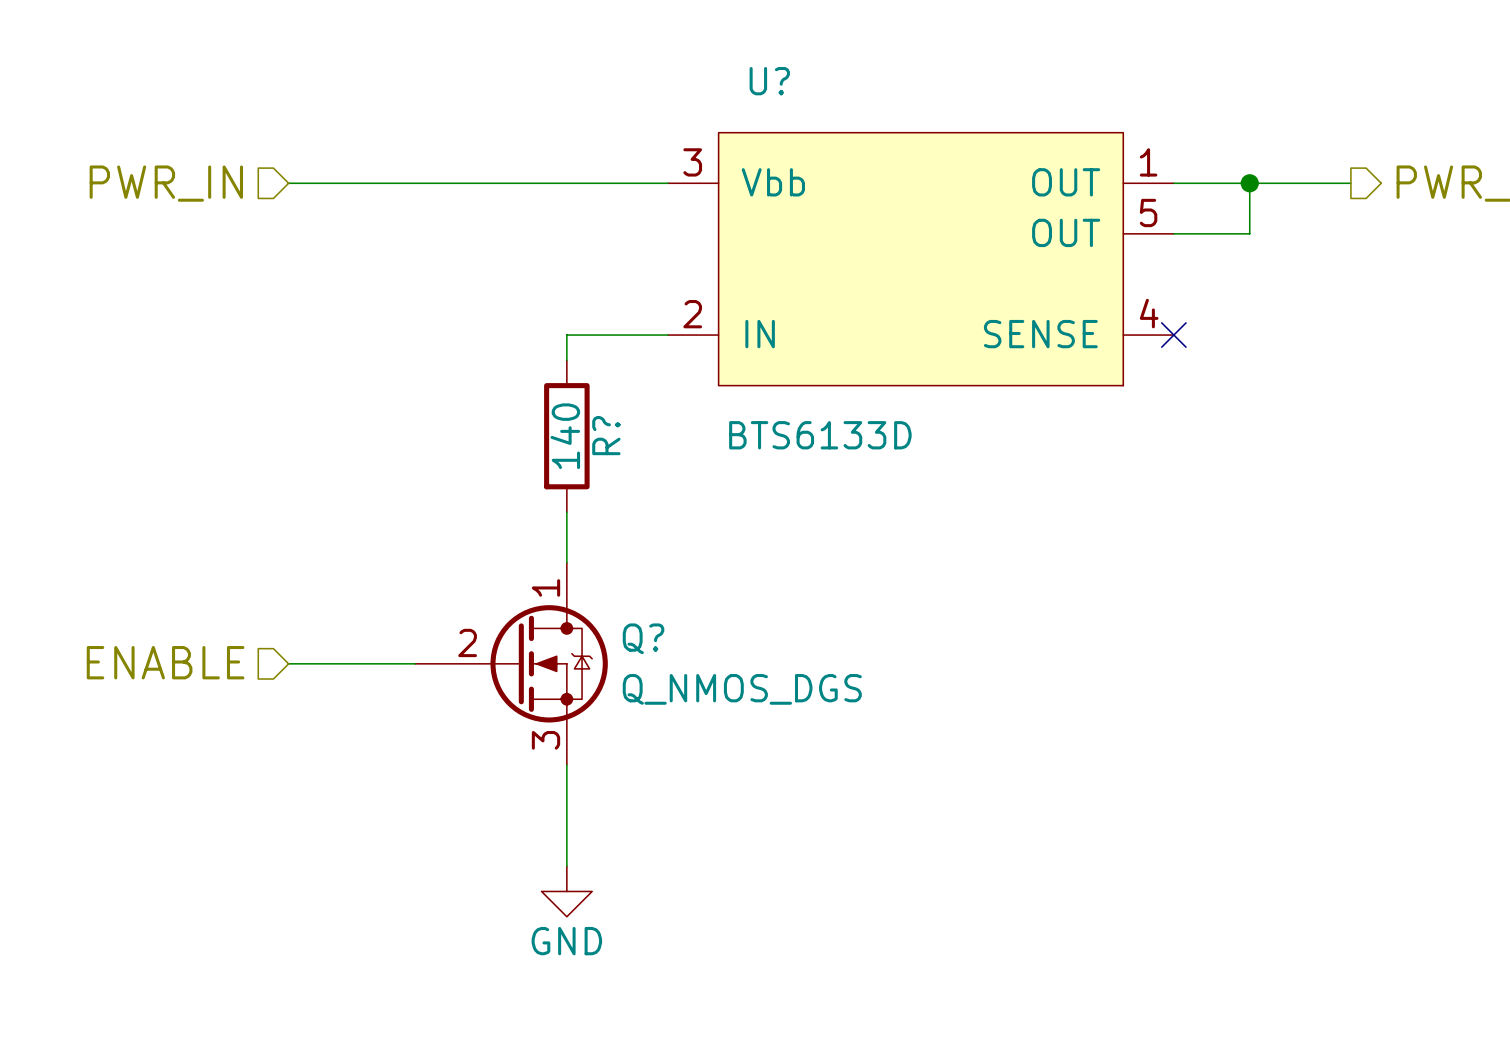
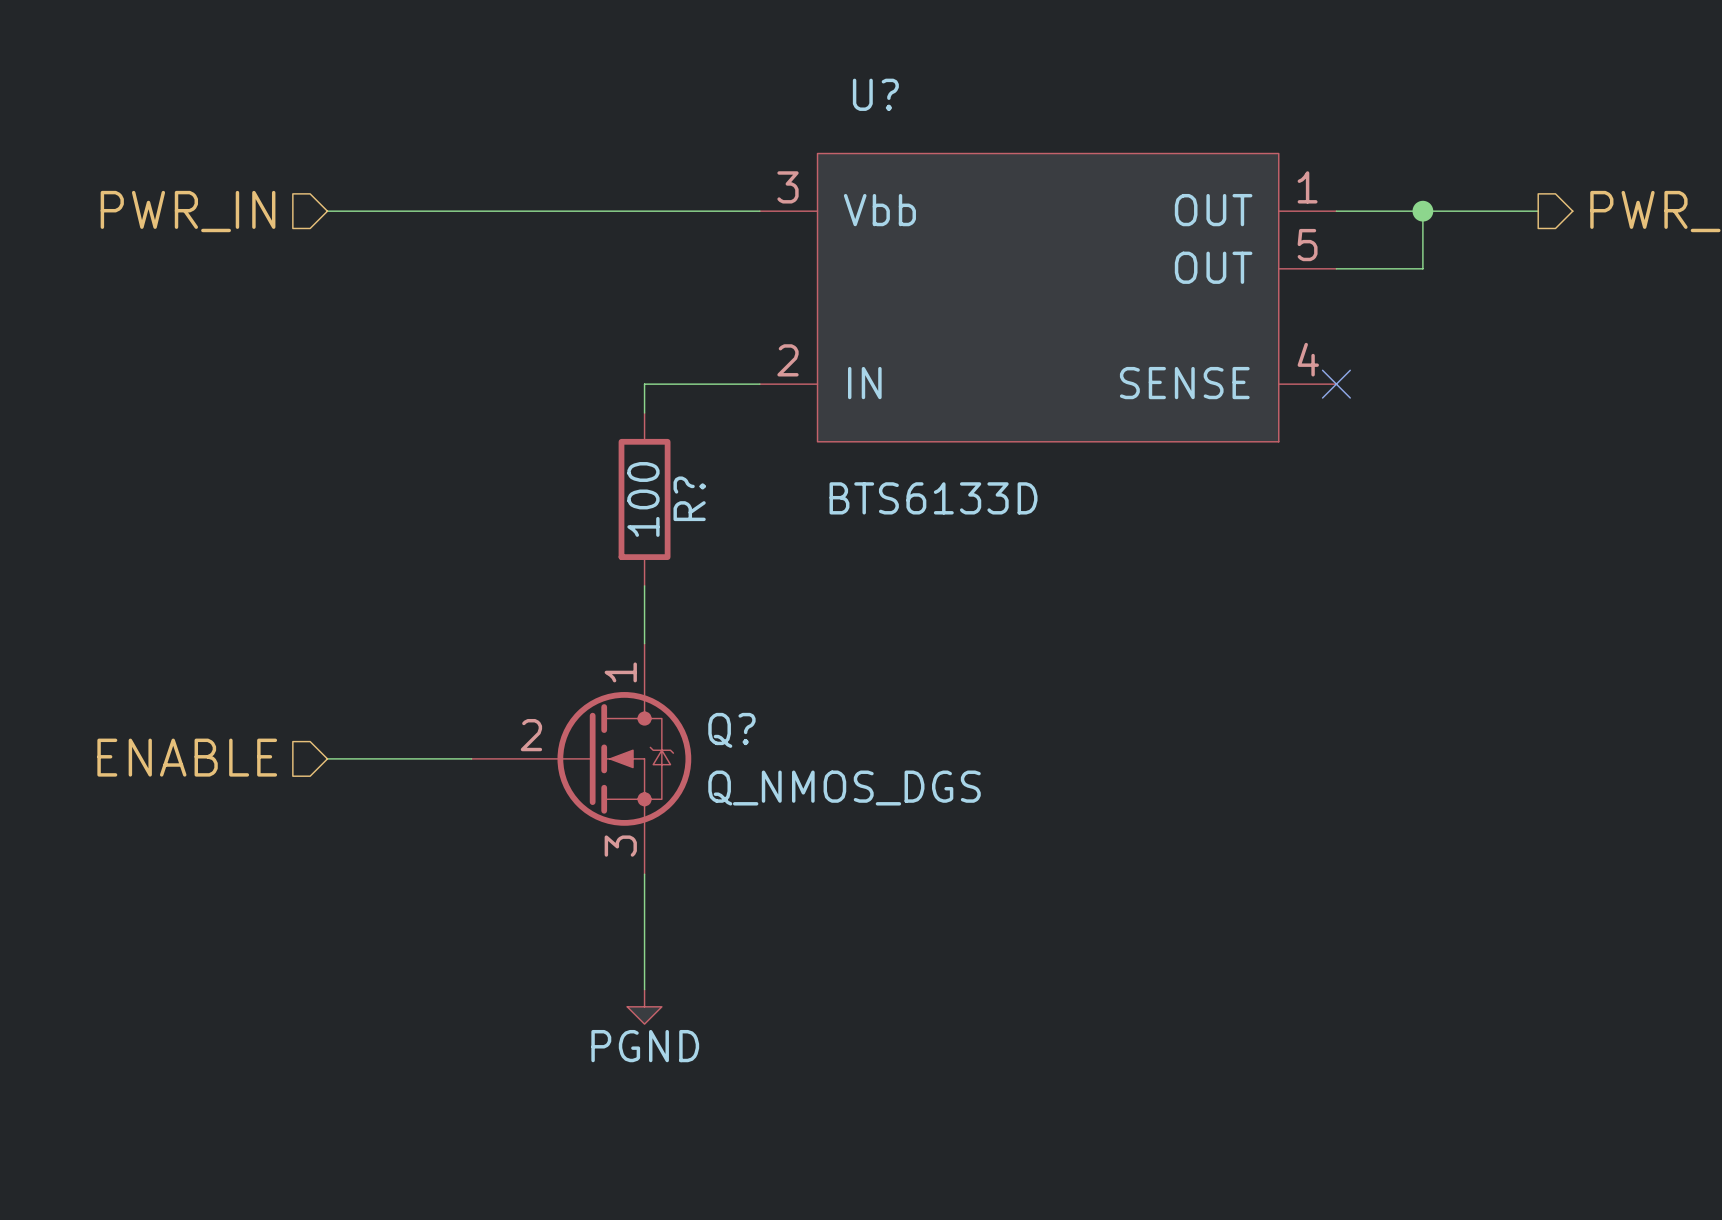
R? value: 140 (565, 436) -> 100 (643, 499)
power symbol: GND (566, 891) -> PGND (644, 1006)

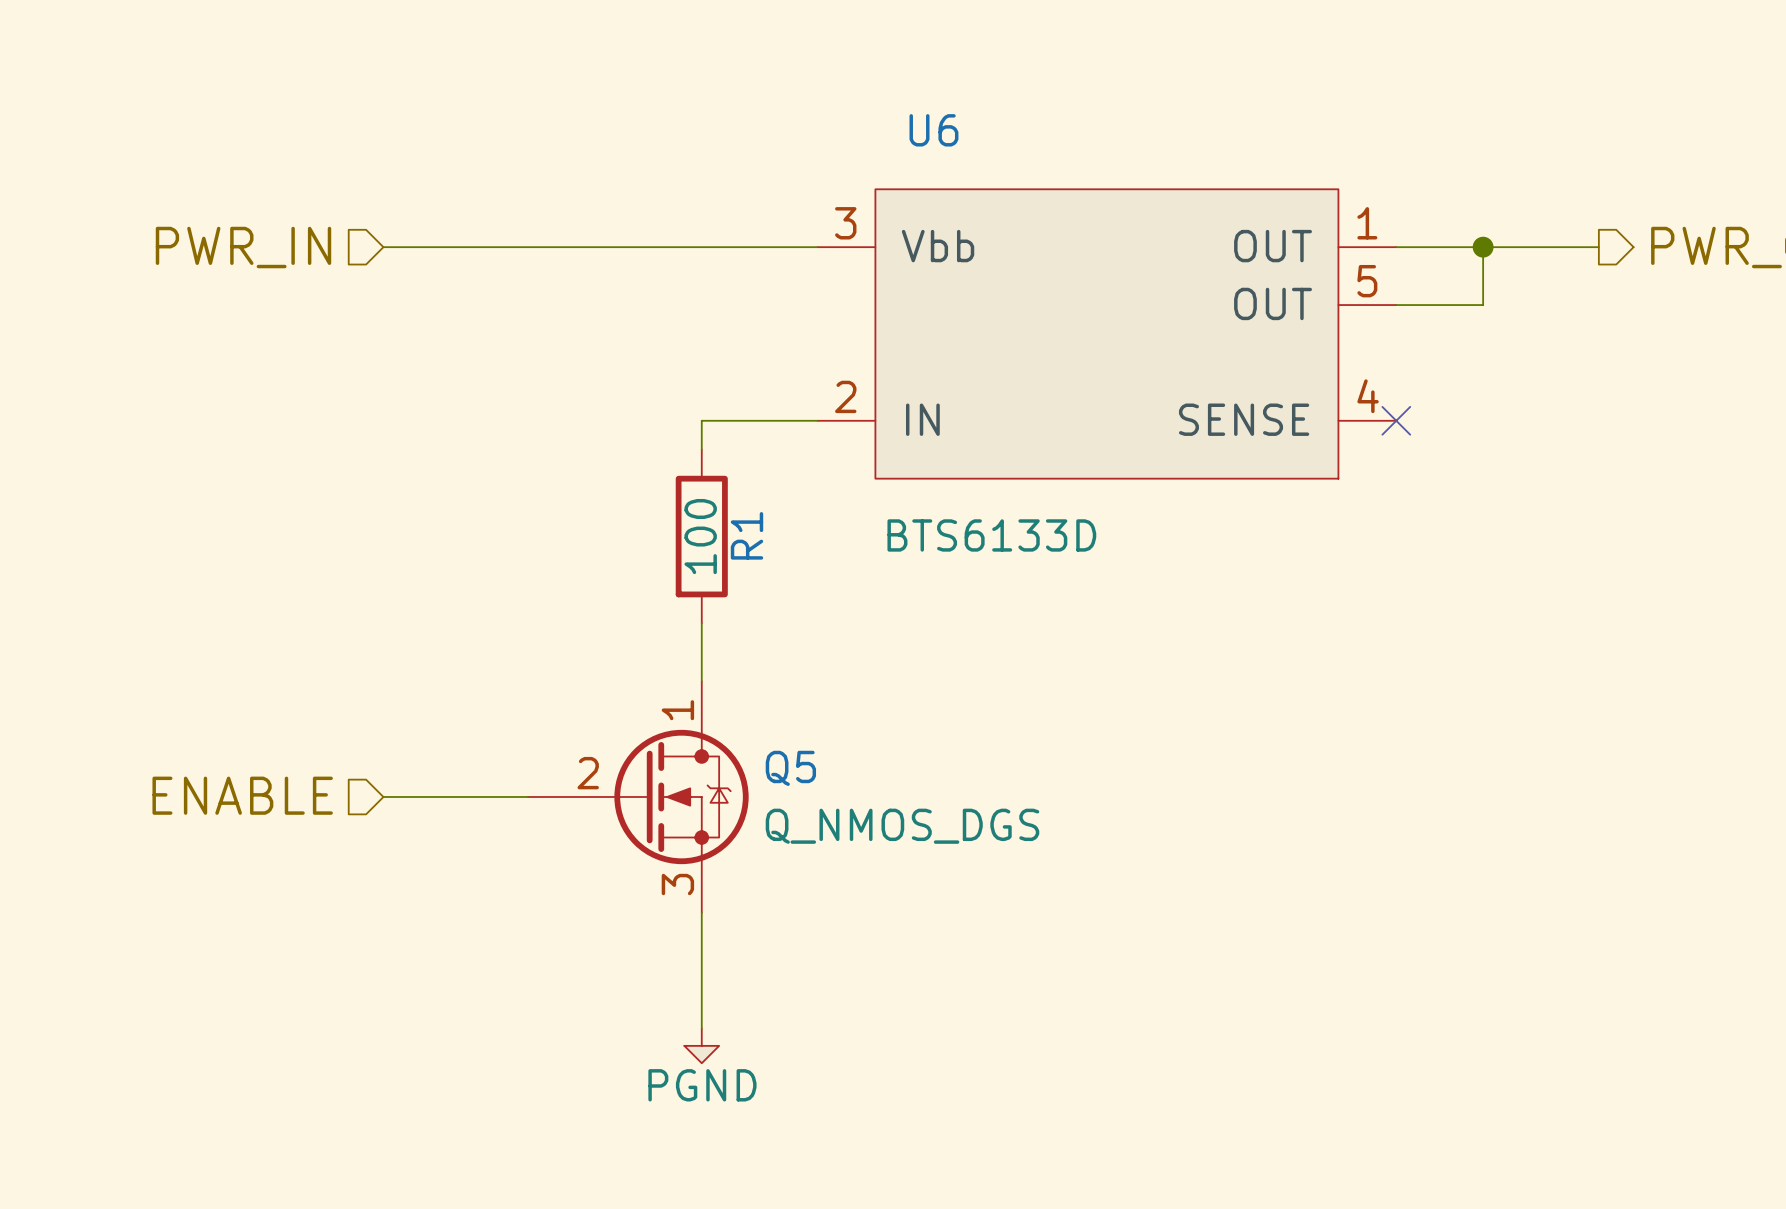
U? name: U? (875, 94) -> U6 (933, 130)
R? name: R? (689, 498) -> R1 (746, 535)
Q? name: Q? (731, 730) -> Q5 (790, 768)

